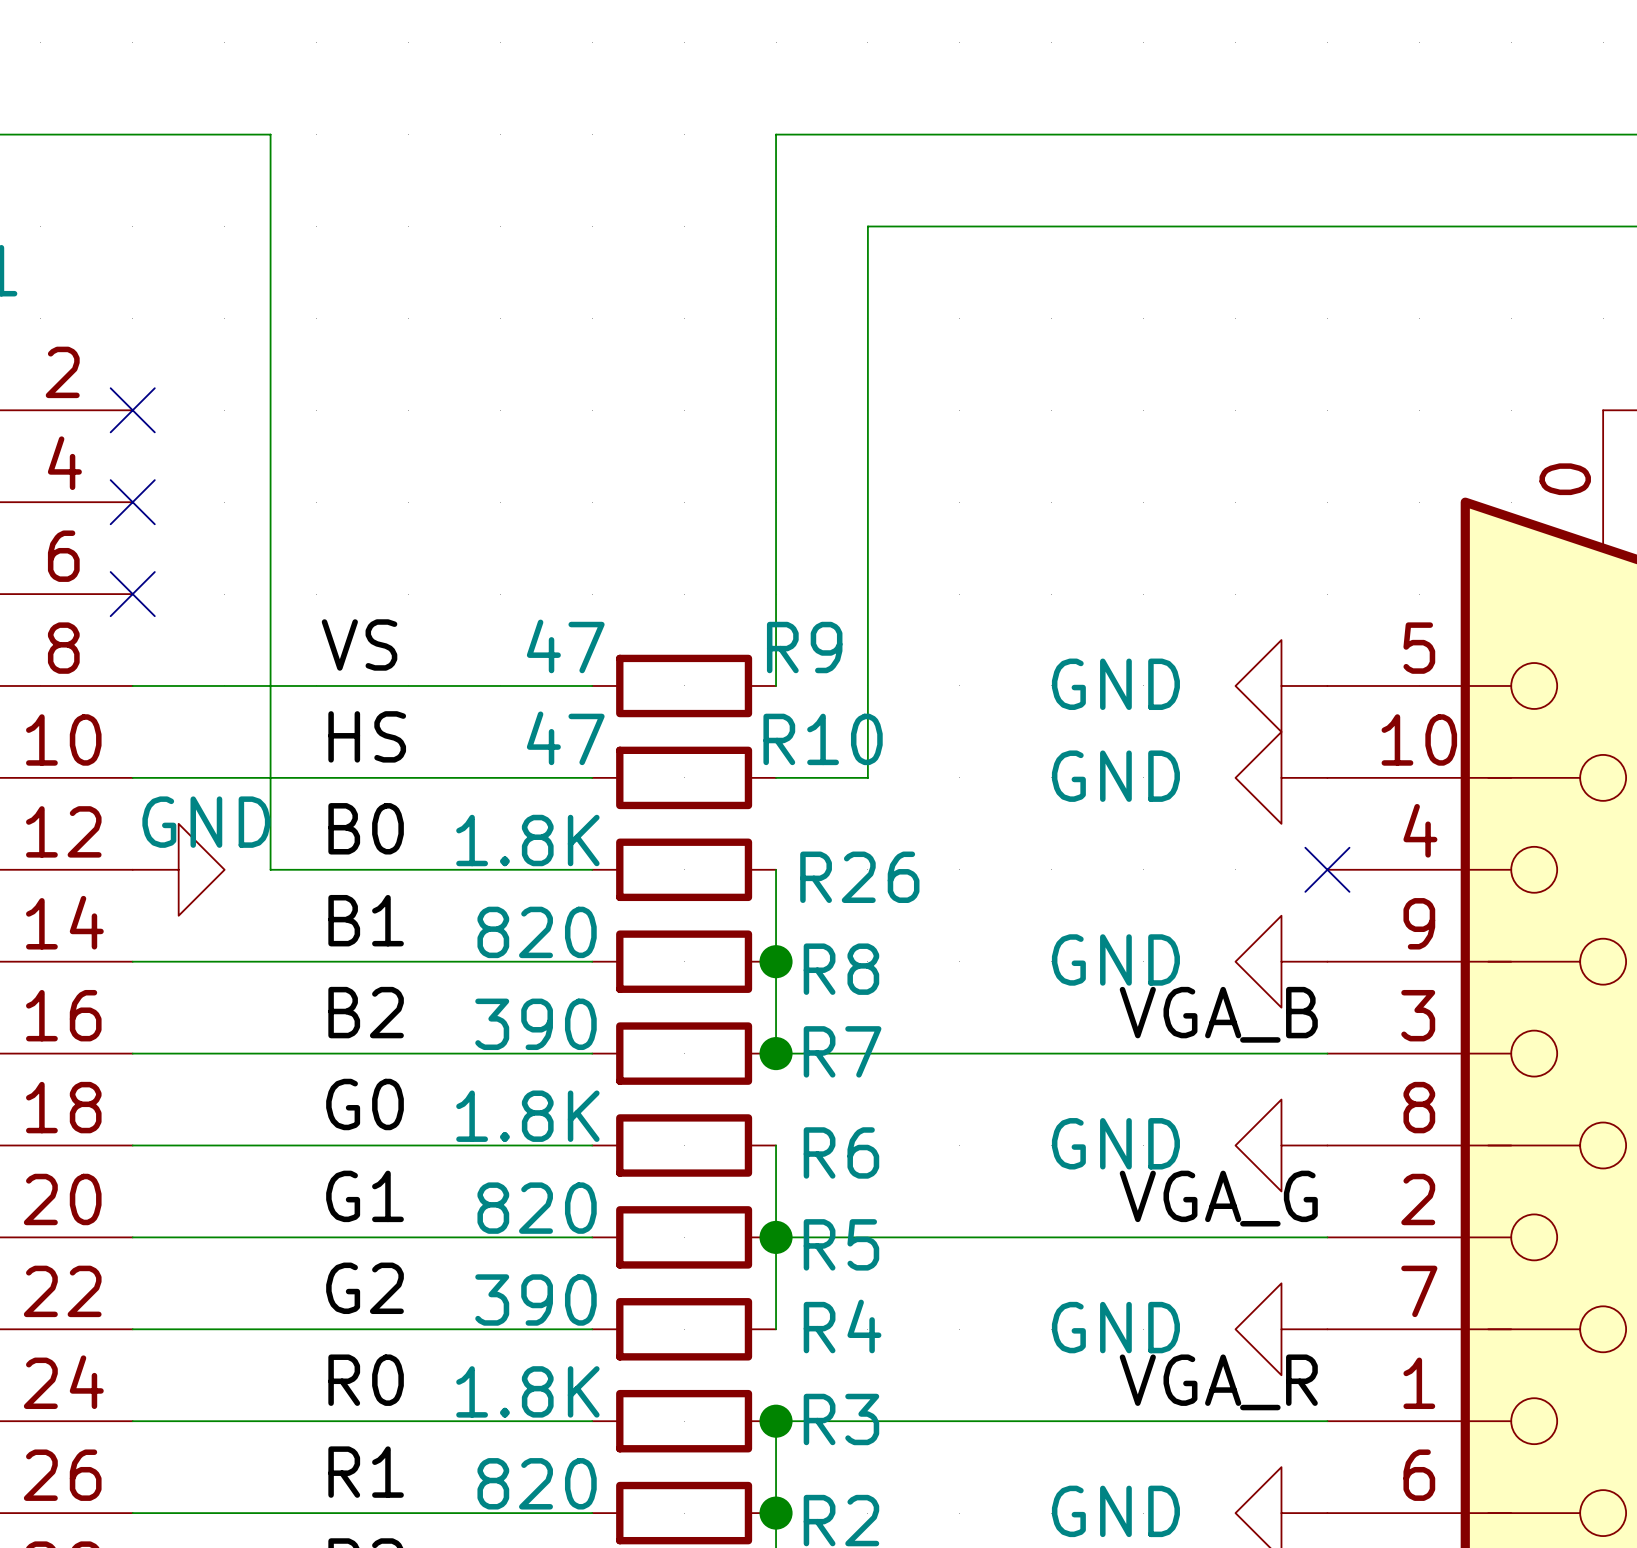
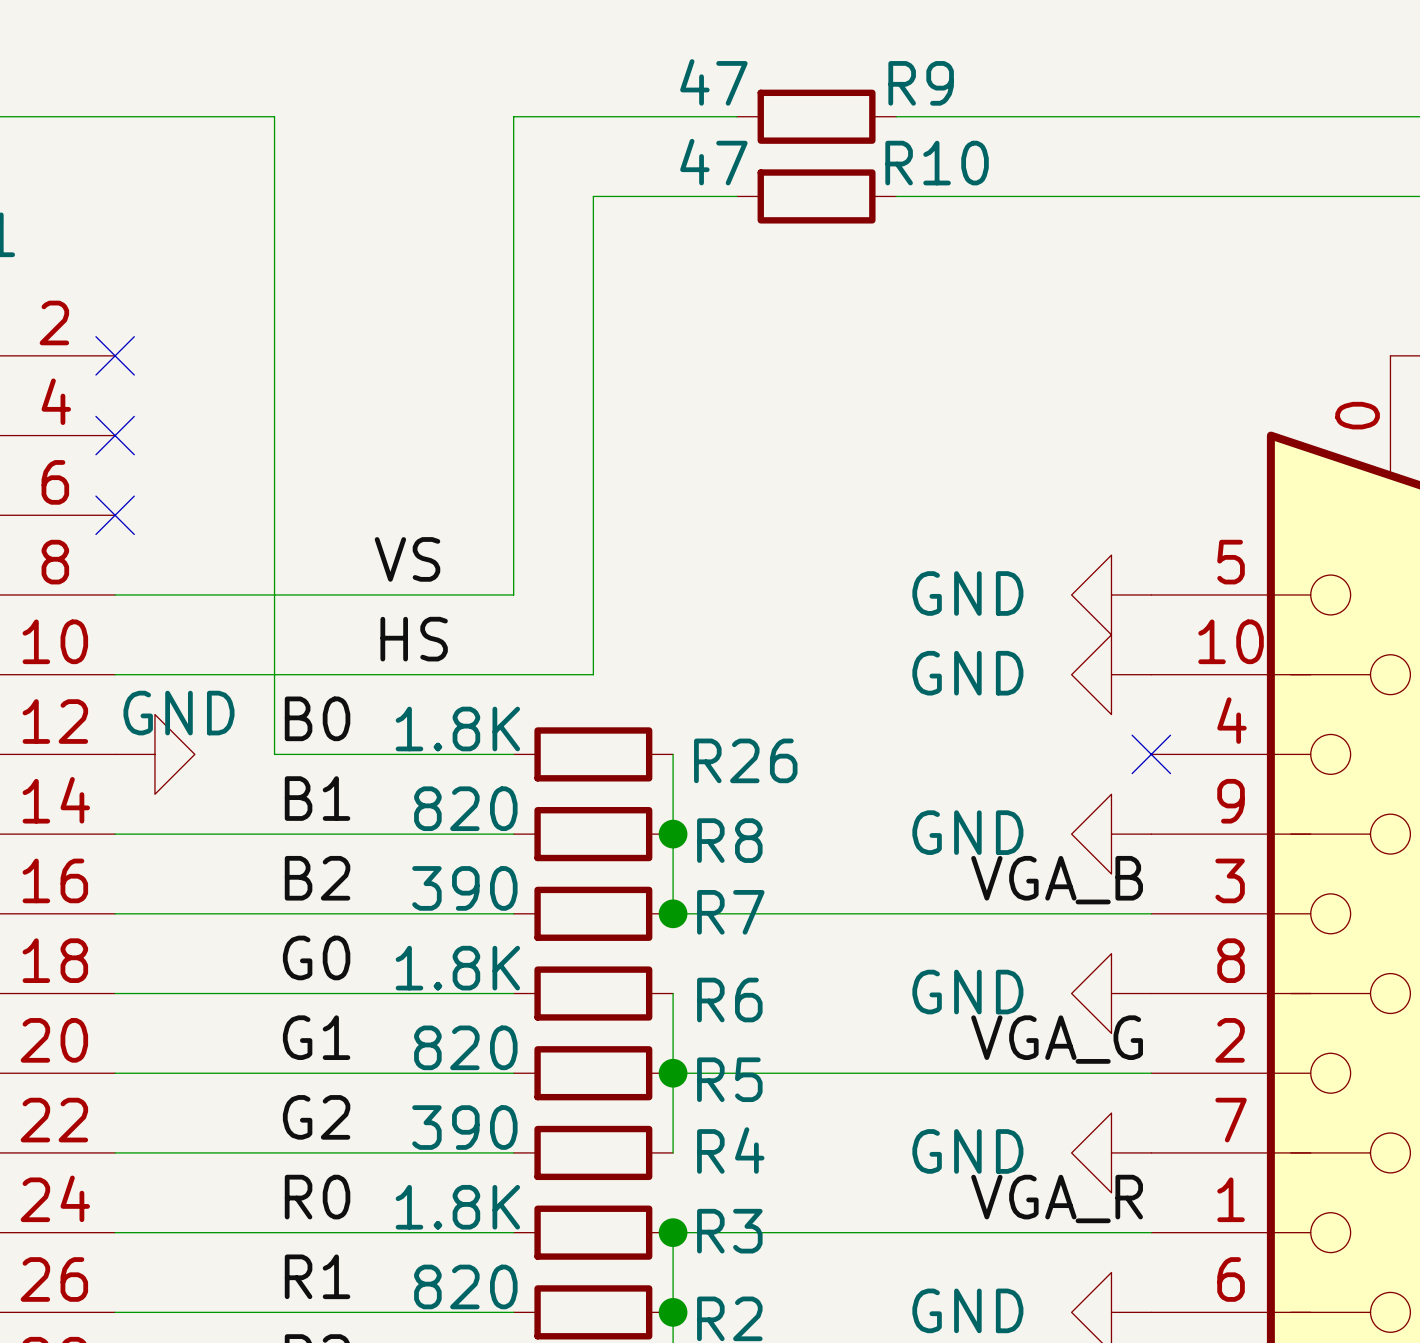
wire: (270, 134) (270, 869) (316, 869) -> (234, 116) (274, 116) (274, 754)
wire: (776, 134) (776, 685) -> (673, 116) (513, 116) (513, 594)
wire: (849, 134) (1033, 134) -> none
wire: (1033, 226) (867, 226) (867, 777) (776, 777) -> (736, 196) (593, 196) (593, 674) (513, 674)
label position: VS (359, 644) -> VS (407, 559)
R9 position: (684, 685) -> (816, 116)
label position: HS (367, 736) -> HS (414, 639)
R10 position: (684, 777) -> (816, 196)

